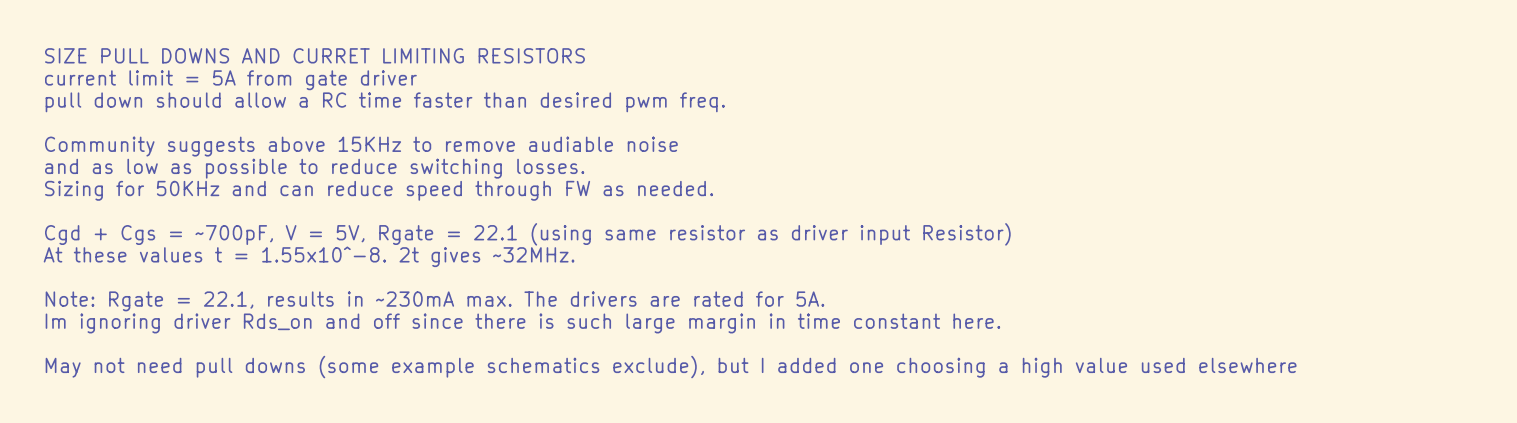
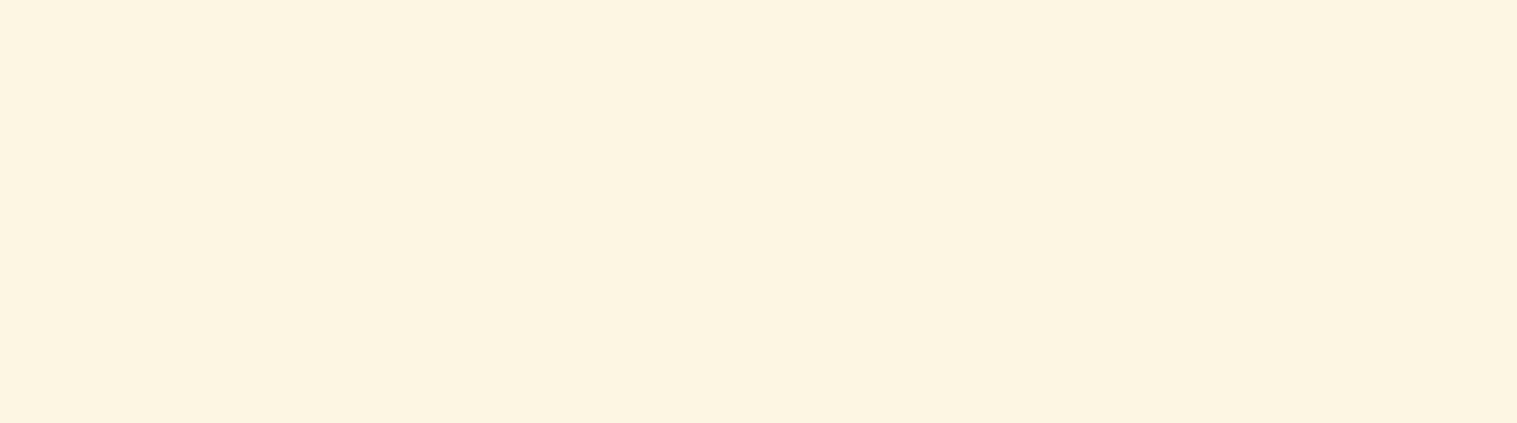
text: SIZE PULL DOWNS AND CURRET LIMITING RESISTORS (314, 55) -> none
text: current limit = 5A from gate driver (230, 80) -> none
text: pull down should allow a RC time faster than desired pwm freq. (385, 102) -> none
text: Community suggests above 15KHz to remove audiable noise (361, 146) -> none
text: and as low as possible to reduce switching losses. (314, 168) -> none
text: Sizing for 50KHz and can reduce speed through FW as needed. (379, 190) -> none
text: Cgd + Cgs = ~700pF, V = 5V, Rgate = 22.1 (using same resistor as driver input Resistor) (527, 234) -> none
text: At these values t = 1.55x10^-8. 2t gives ~32MHz. (309, 256) -> none
text: Note: Rgate = 22.1, results in ~230mA max. The drivers are rated for 5A. (434, 301) -> none
text: Im ignoring driver Rds_on and off since there is such large margin in time constant here. (522, 323) -> none
text: May not need pull downs (some example schematics exclude), but I added one choosing a high value used elsewhere (671, 367) -> none

